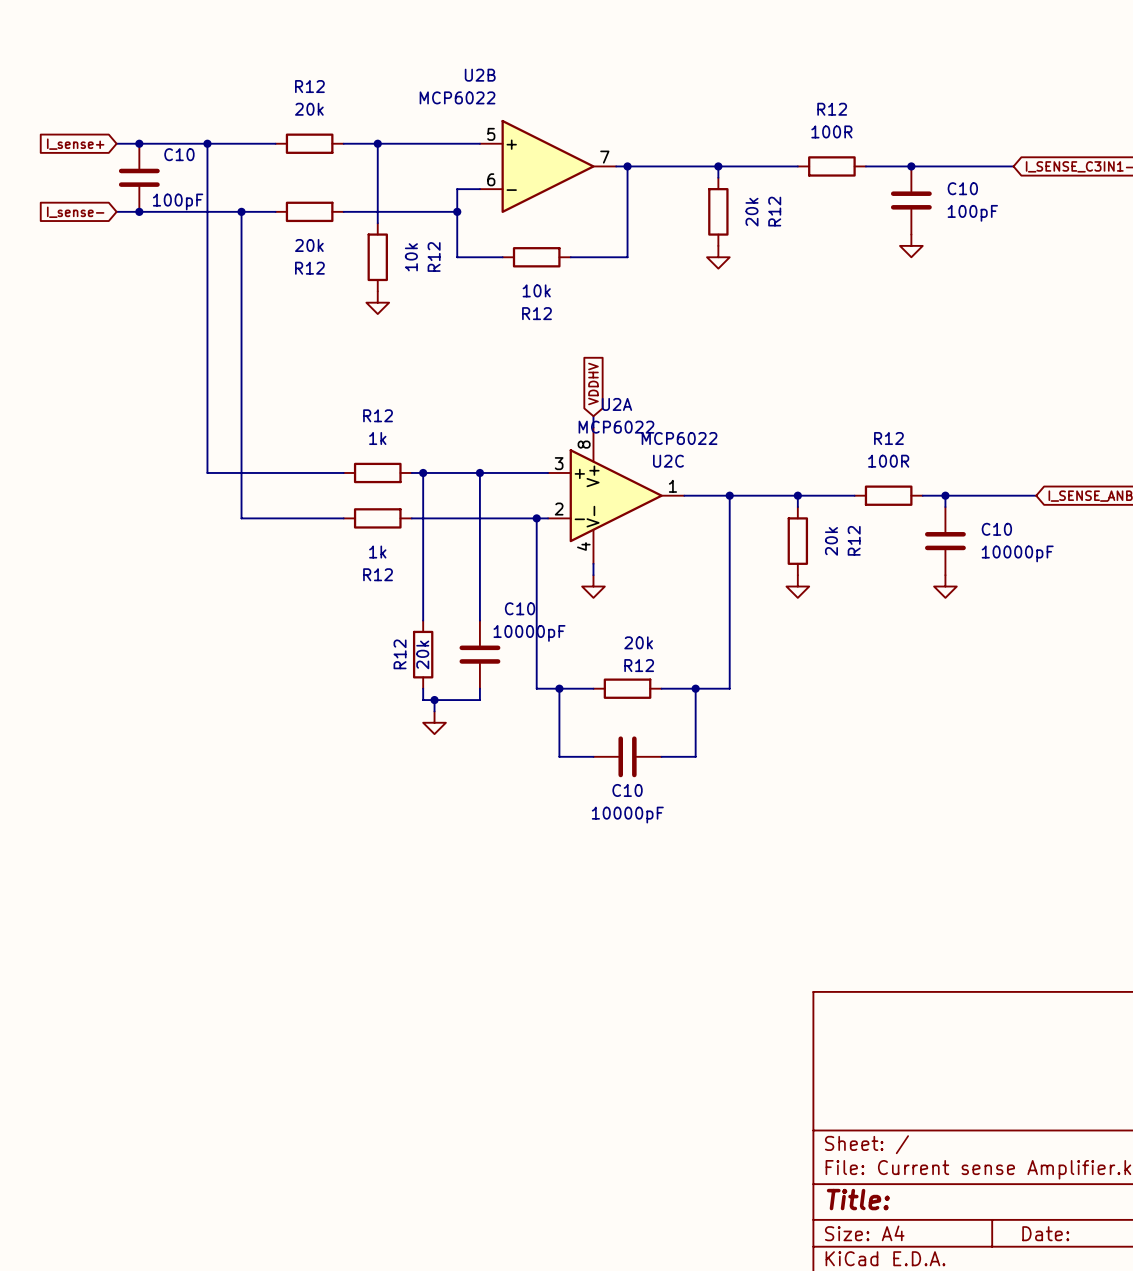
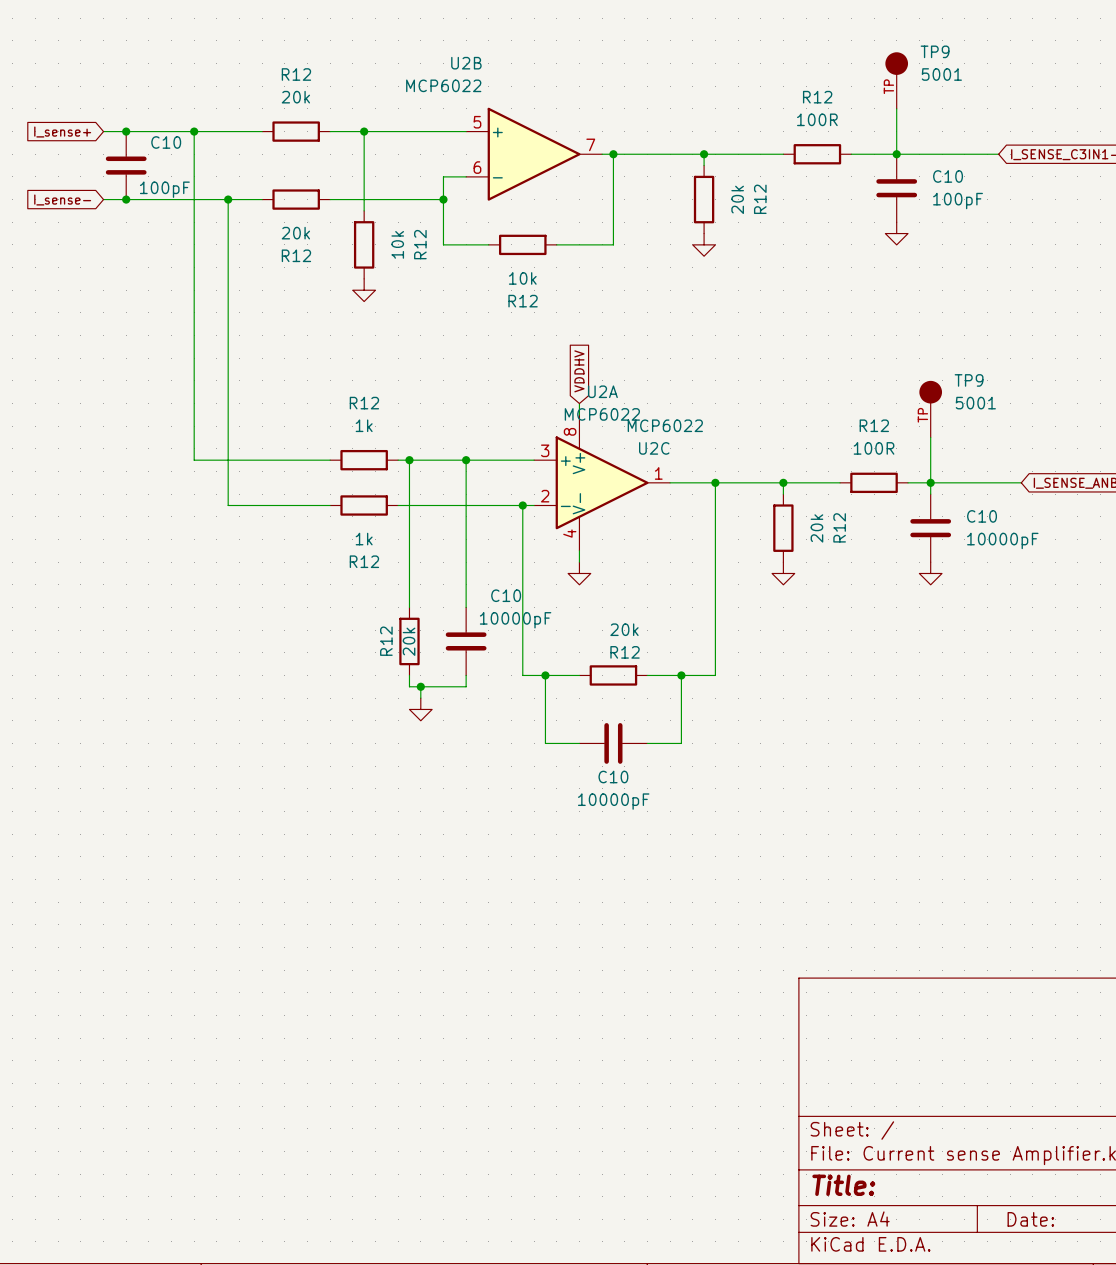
TP9: none -> 5001 (896, 80)
wire: none -> (896, 108) (896, 154)
TP9: none -> 5001 (930, 409)
wire: none -> (930, 437) (930, 482)

